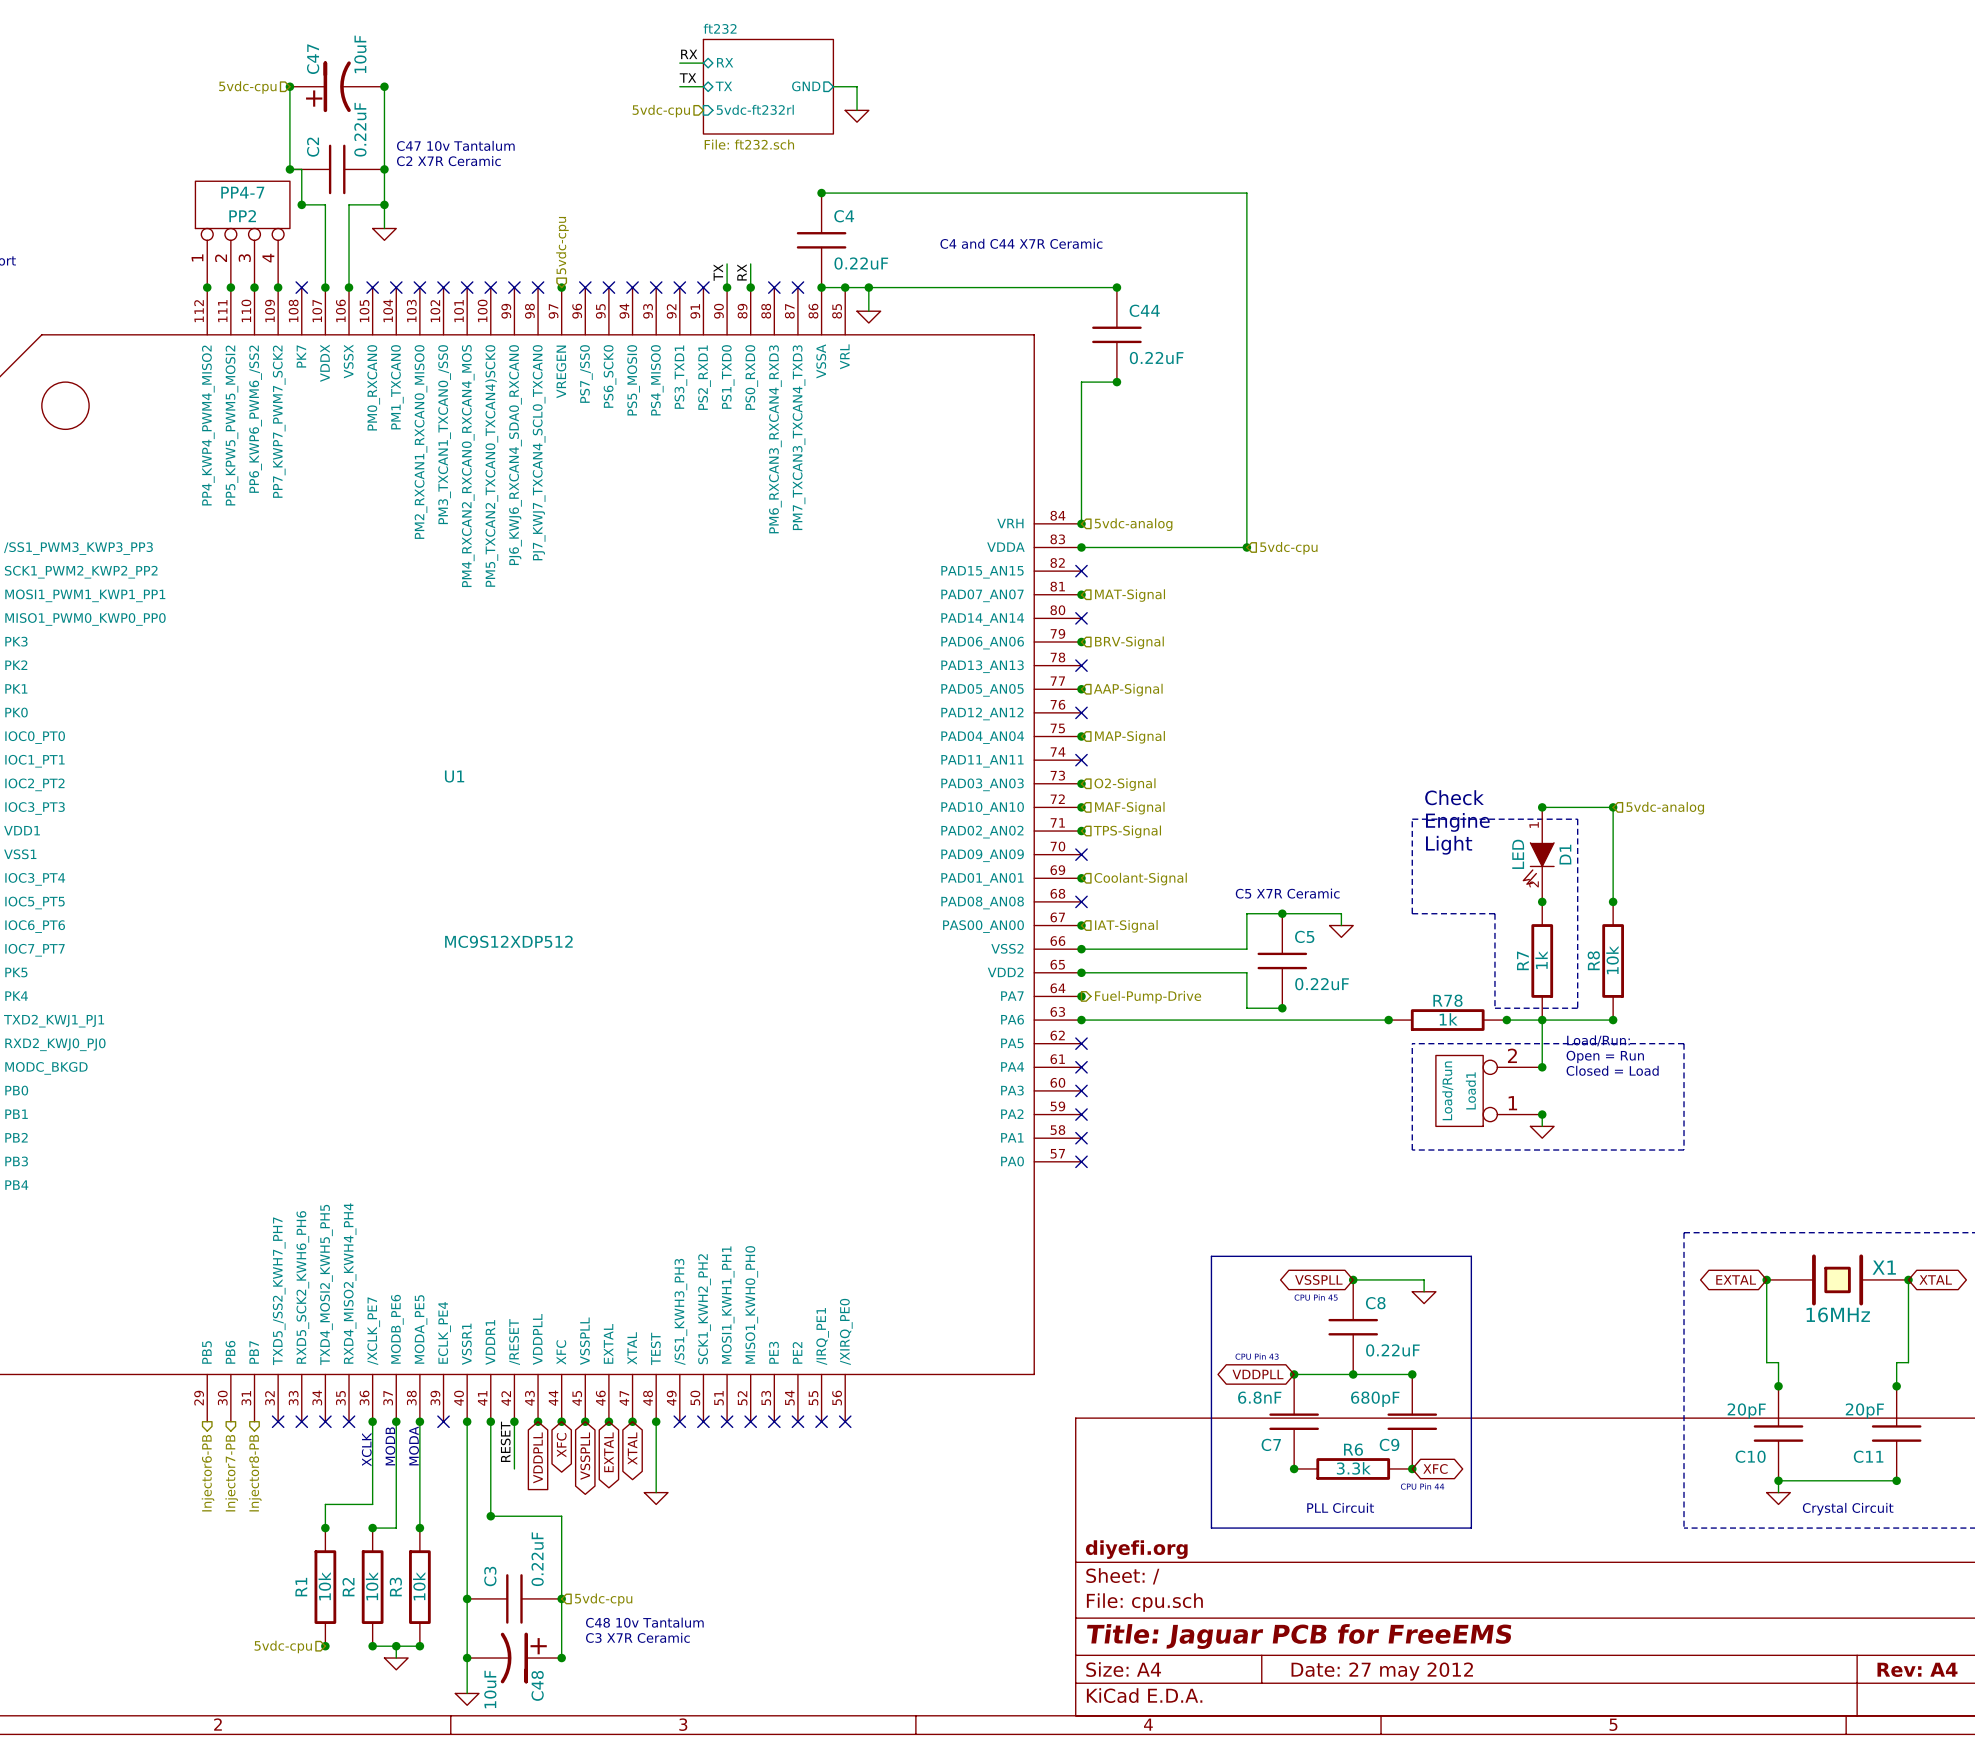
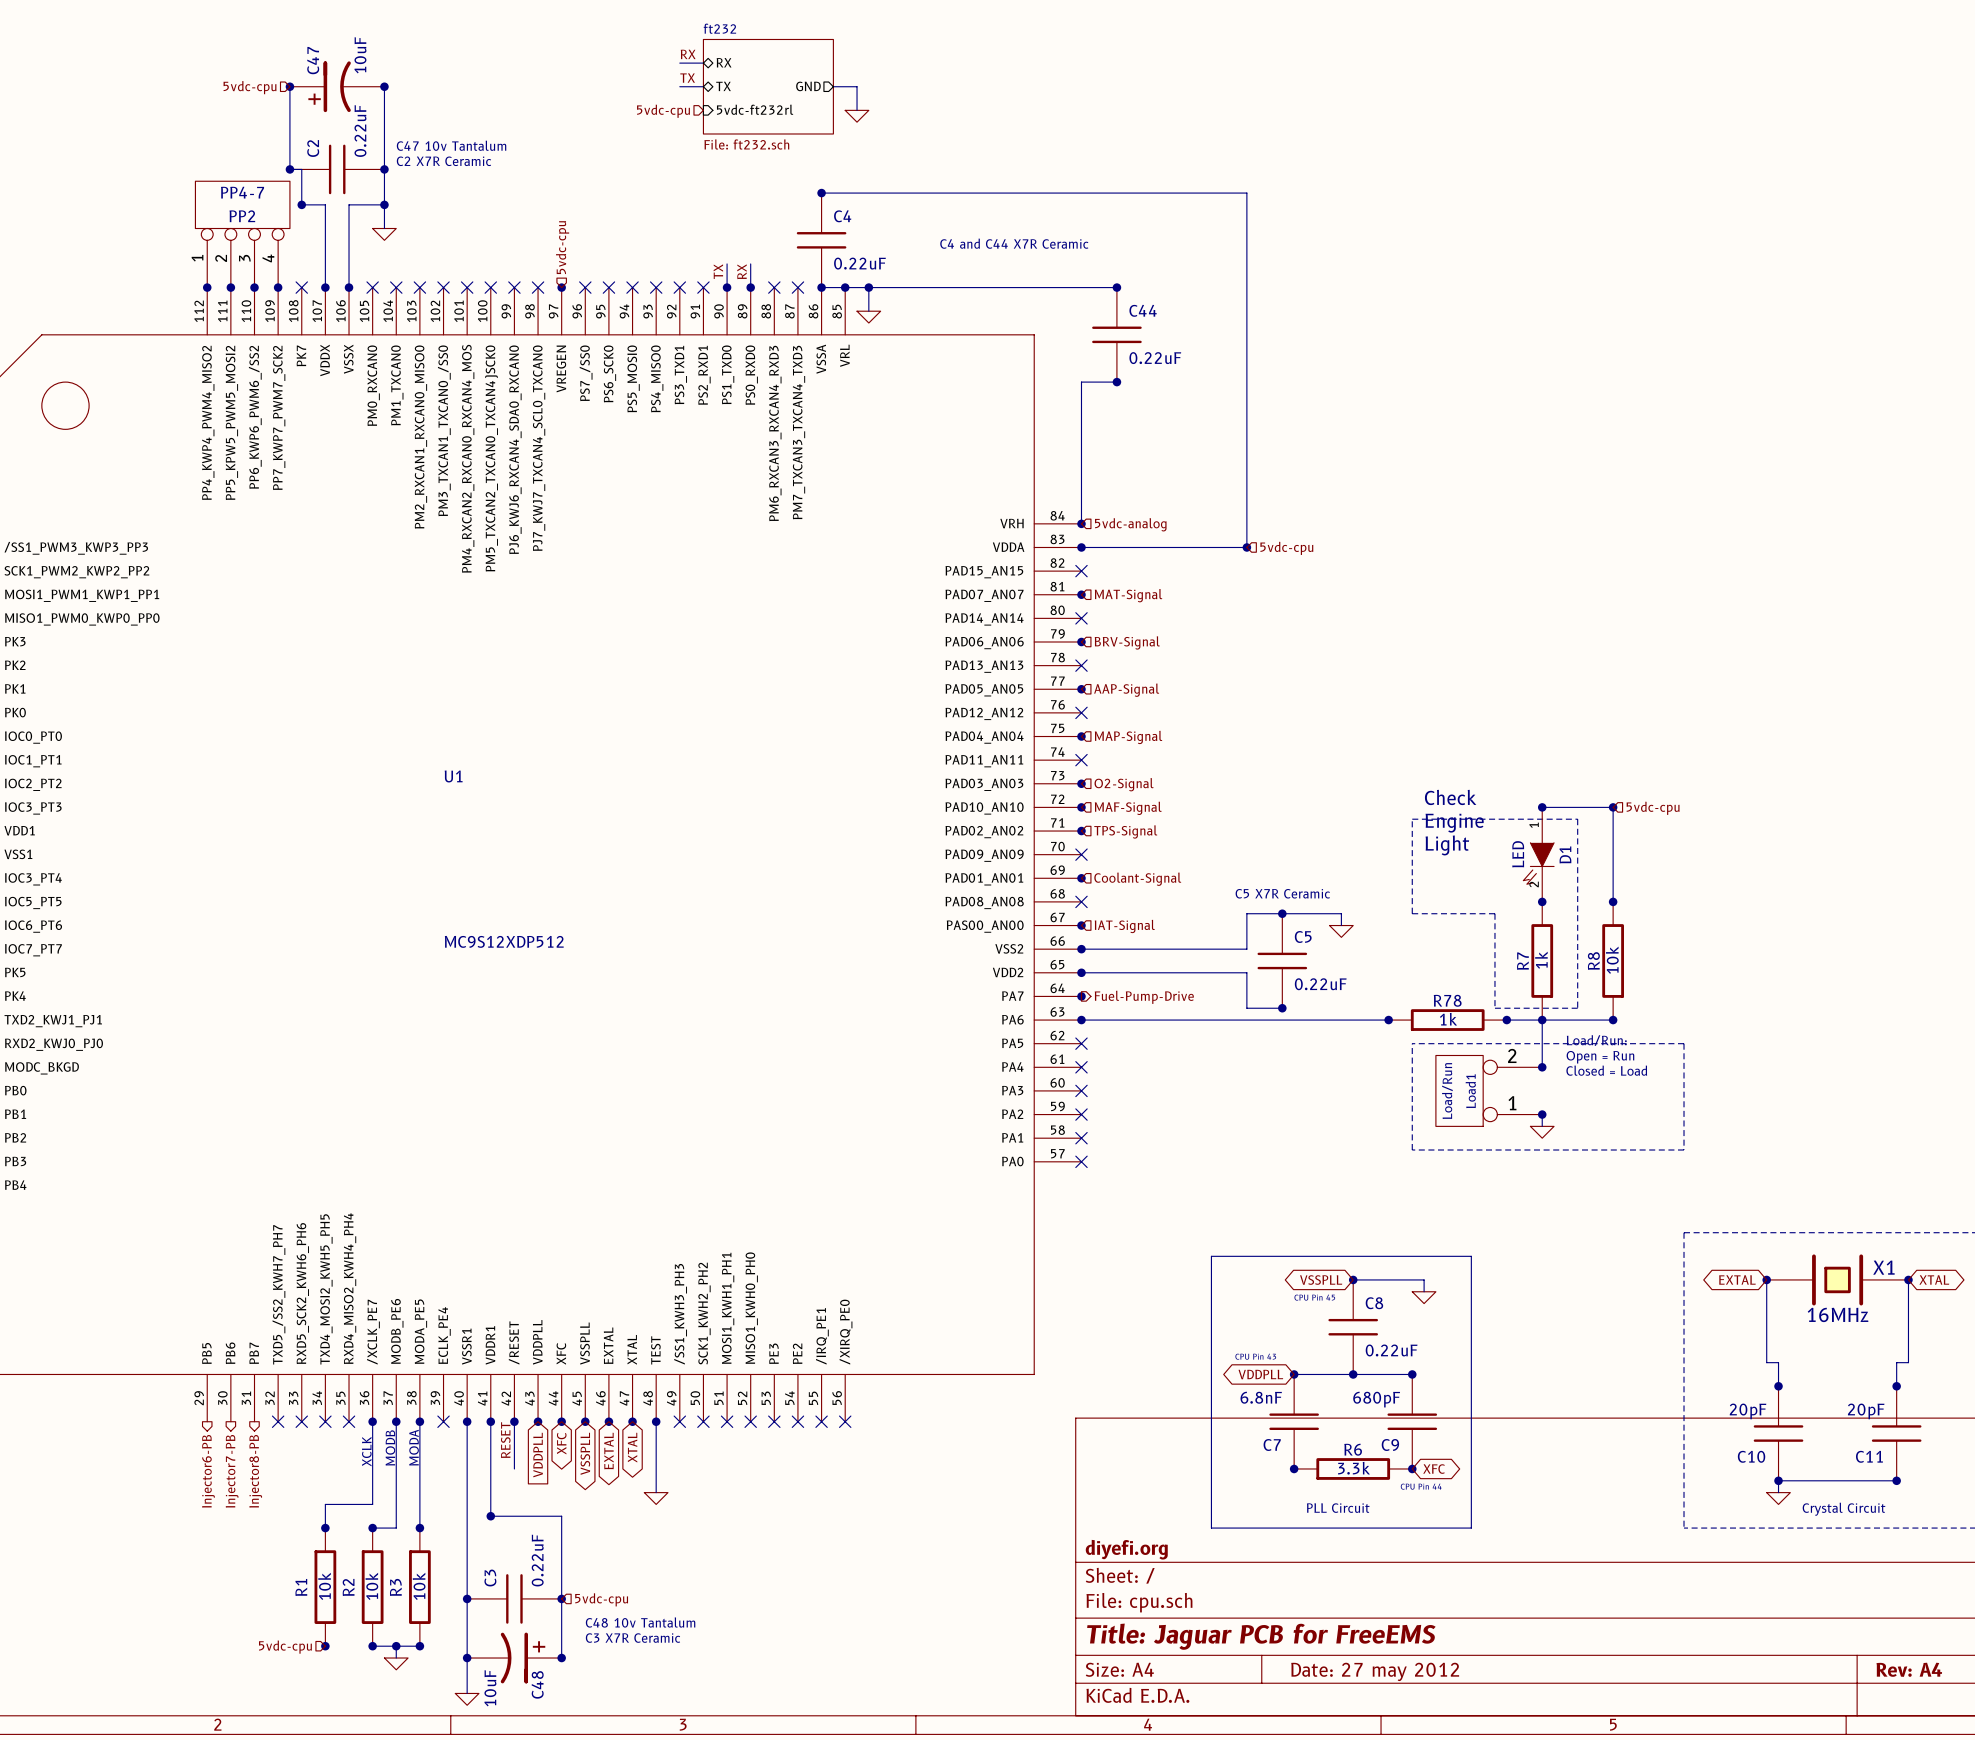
hierarchical label: 5vdc-analog (1665, 808) -> 5vdc-cpu (1653, 808)

